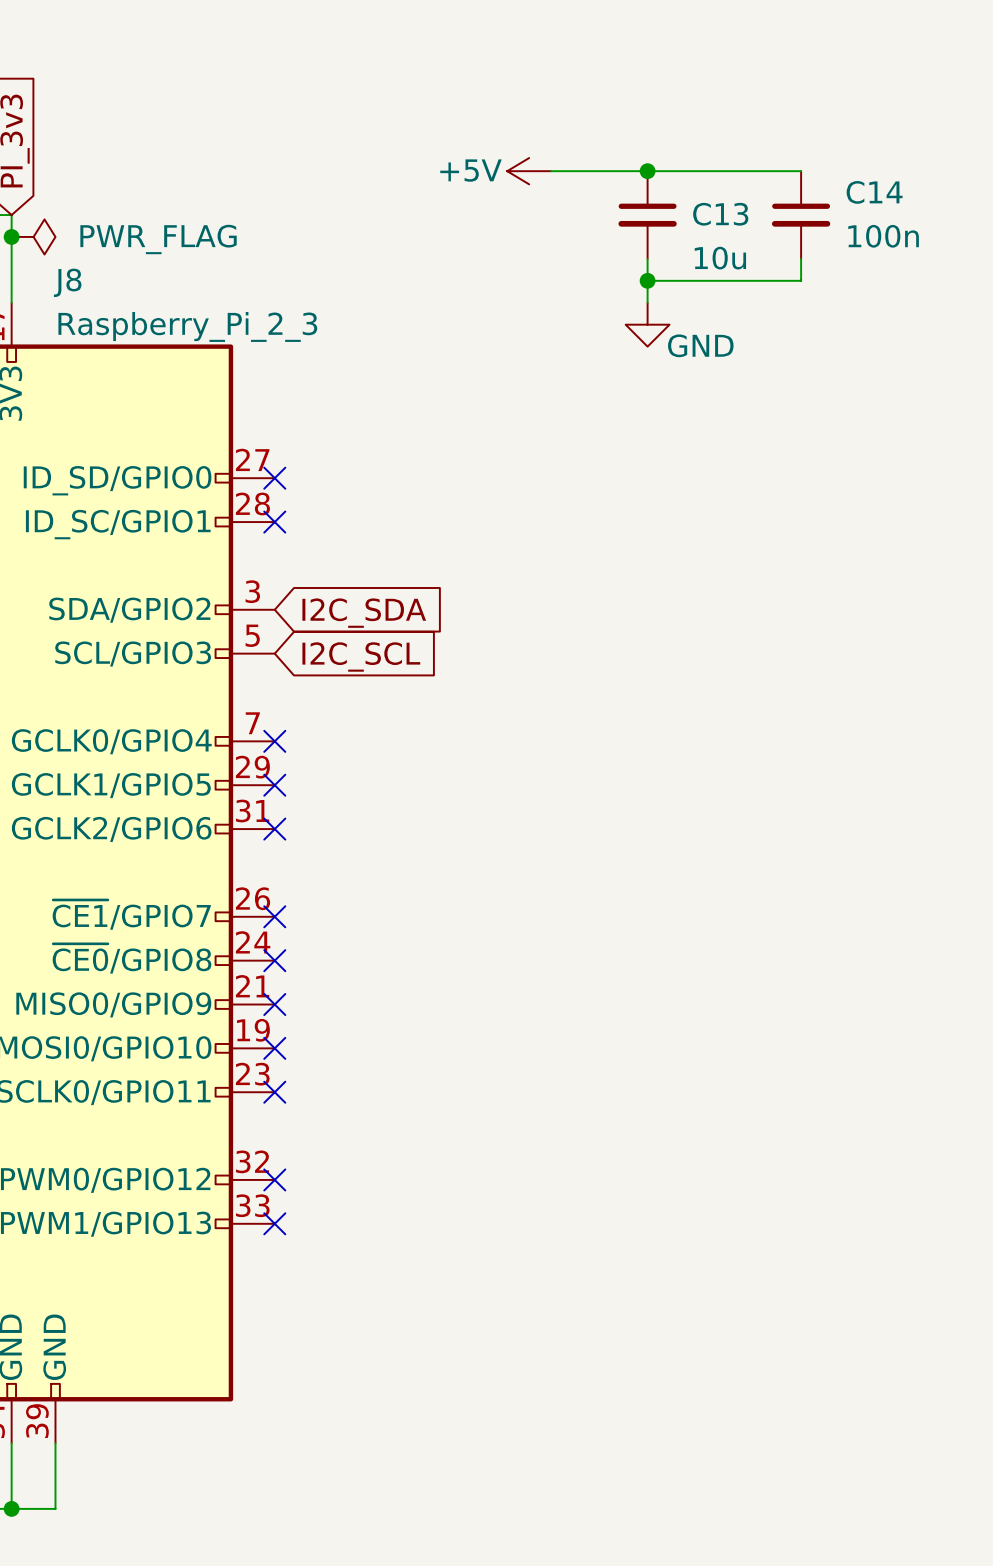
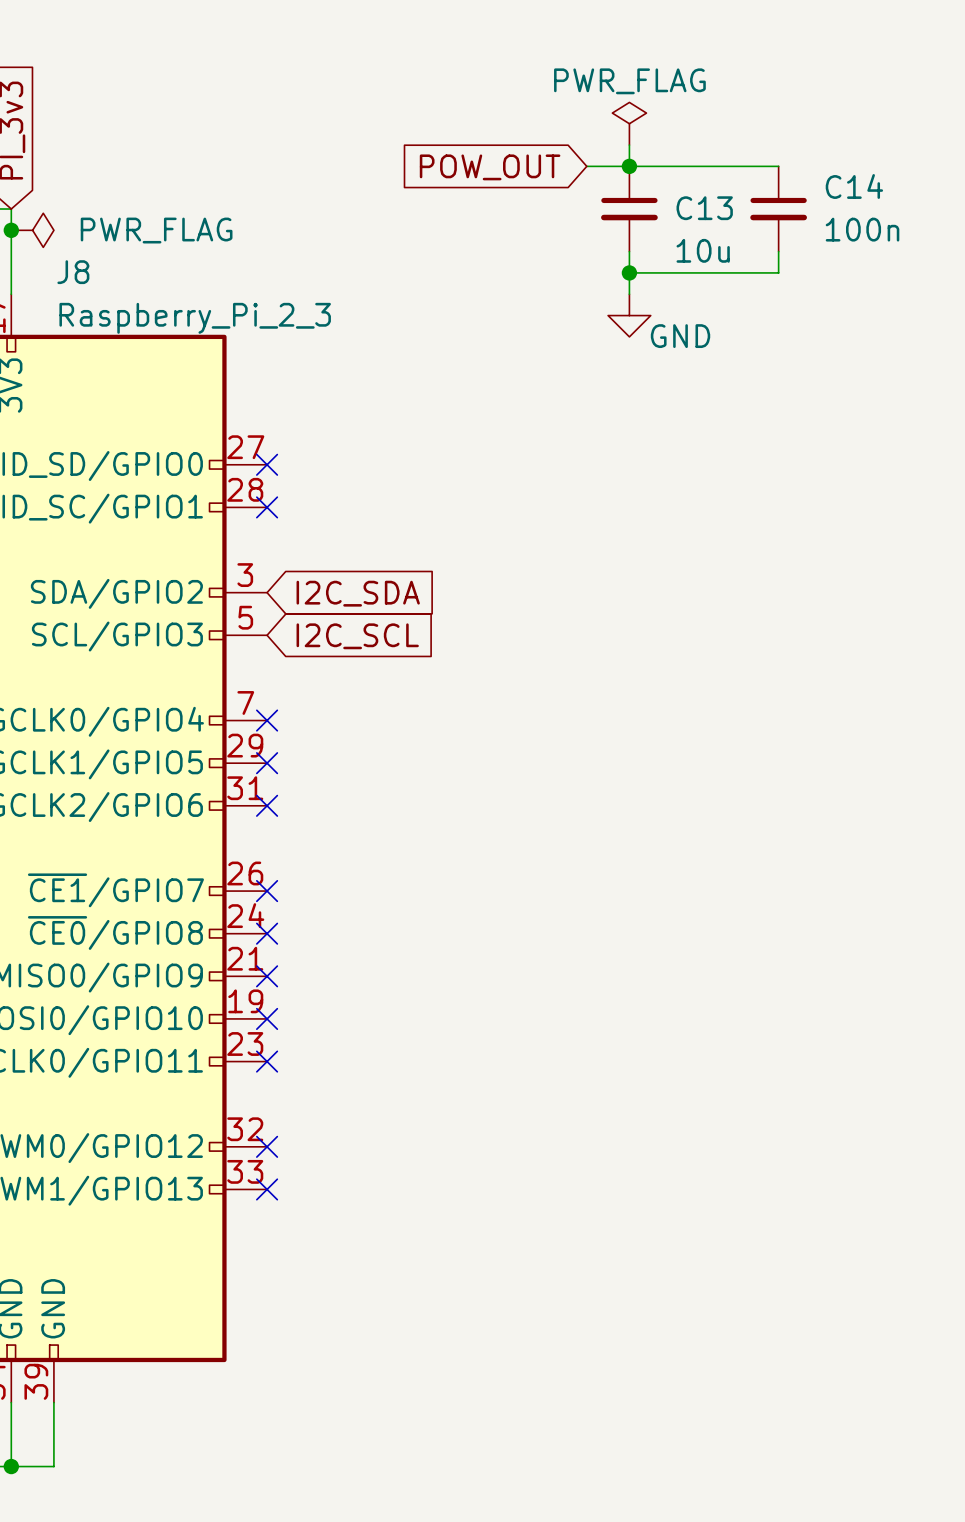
power symbol: none -> PWR_FLAG (629, 123)
wire: none -> (629, 145) (629, 166)
power symbol: +5V (529, 171) -> none
wire: (551, 171) (603, 171) -> none
global label: none -> POW_OUT (490, 167)

